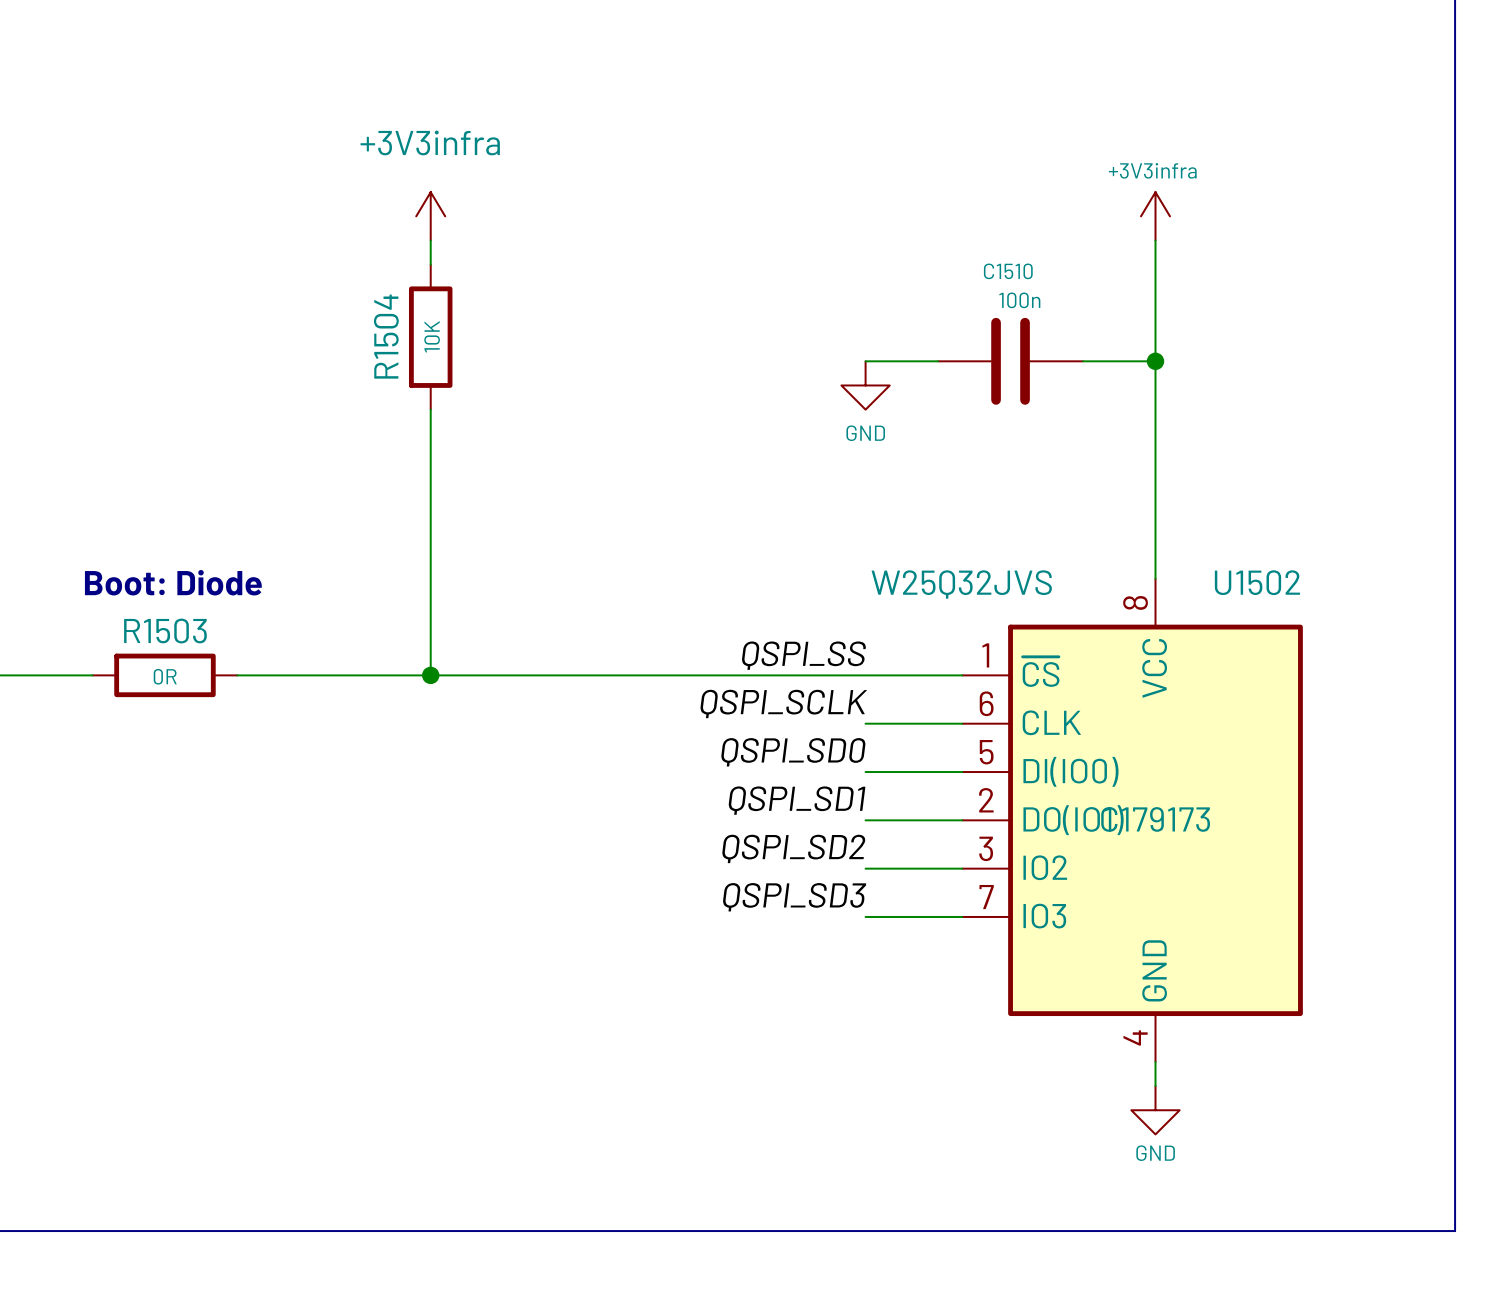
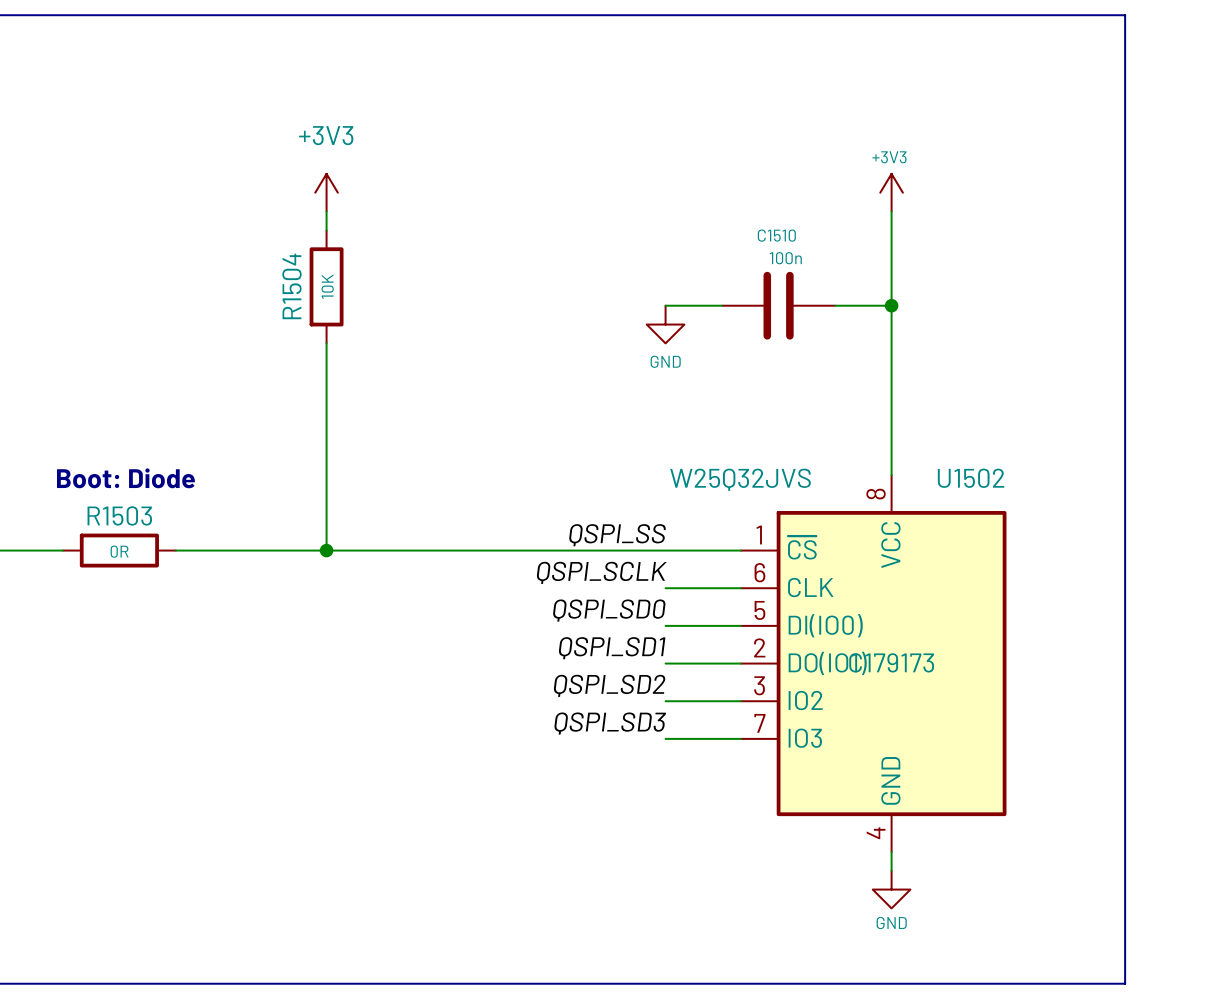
power symbol: +3V3infra (430, 216) -> +3V3 (326, 192)
power symbol: +3V3infra (1155, 216) -> +3V3 (891, 192)

